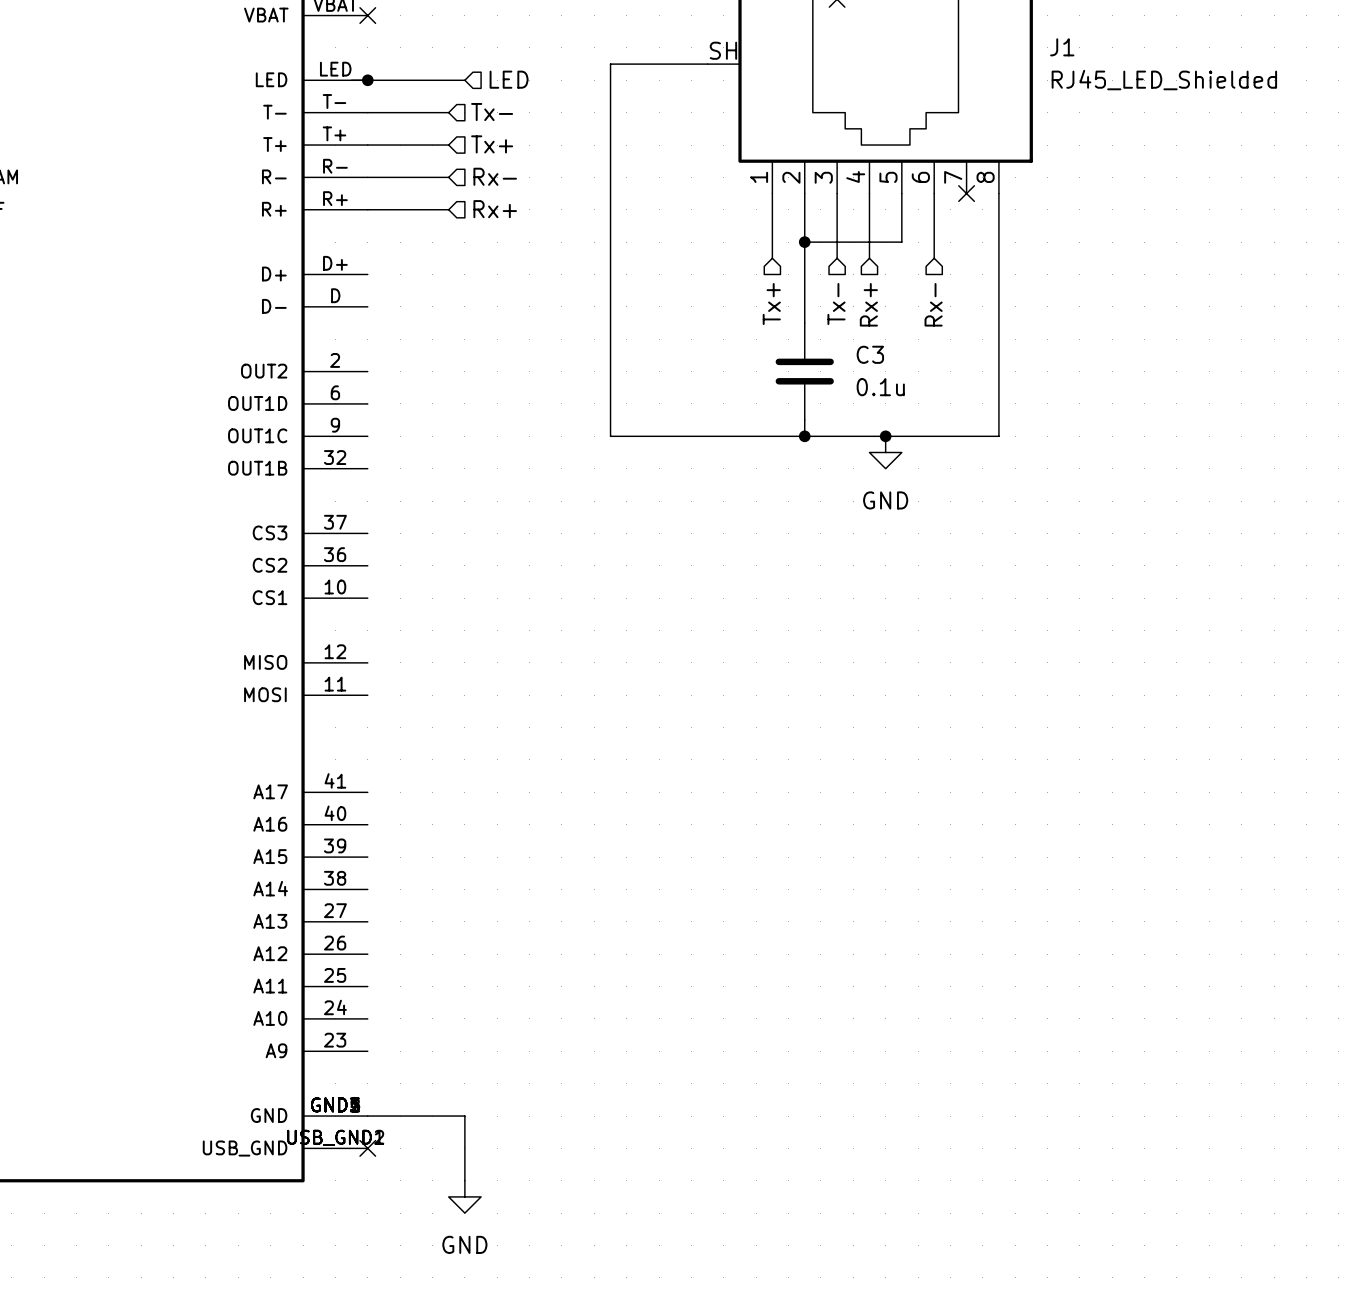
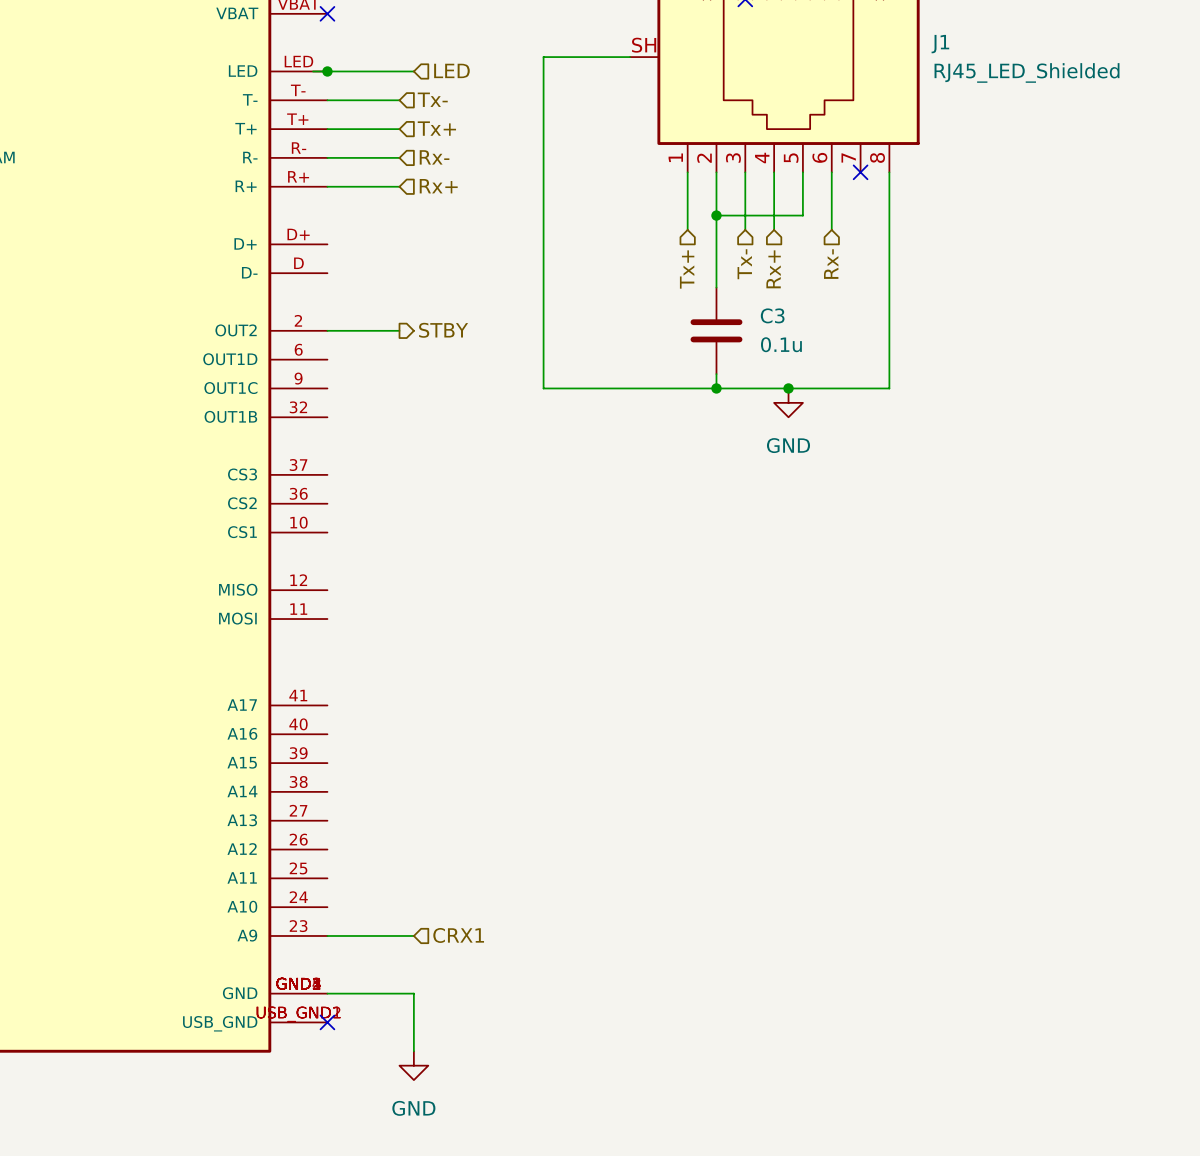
hierarchical label: none -> STBY (443, 330)
wire: none -> (327, 330) (399, 330)
hierarchical label: none -> CRX1 (458, 935)
wire: none -> (327, 935) (413, 935)

